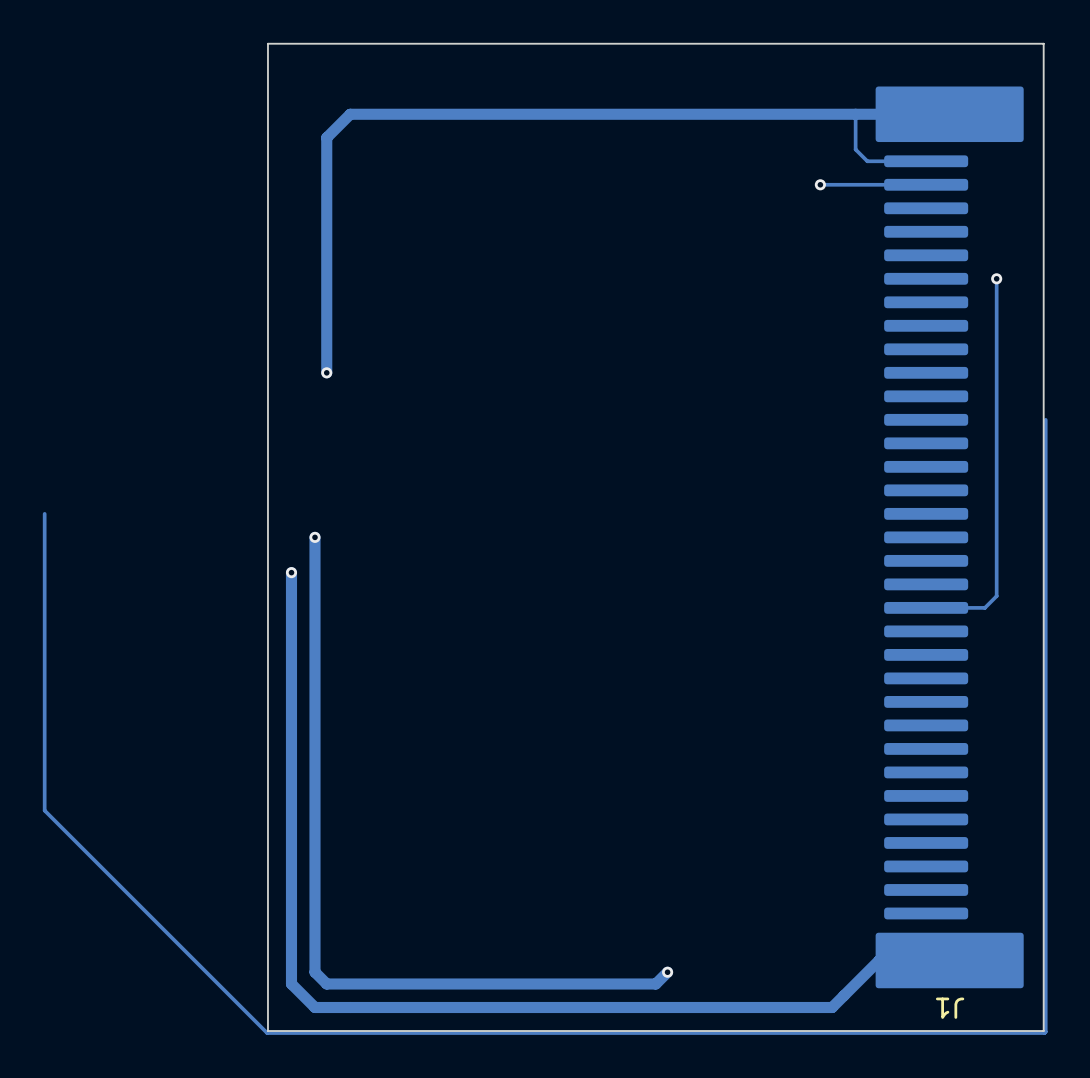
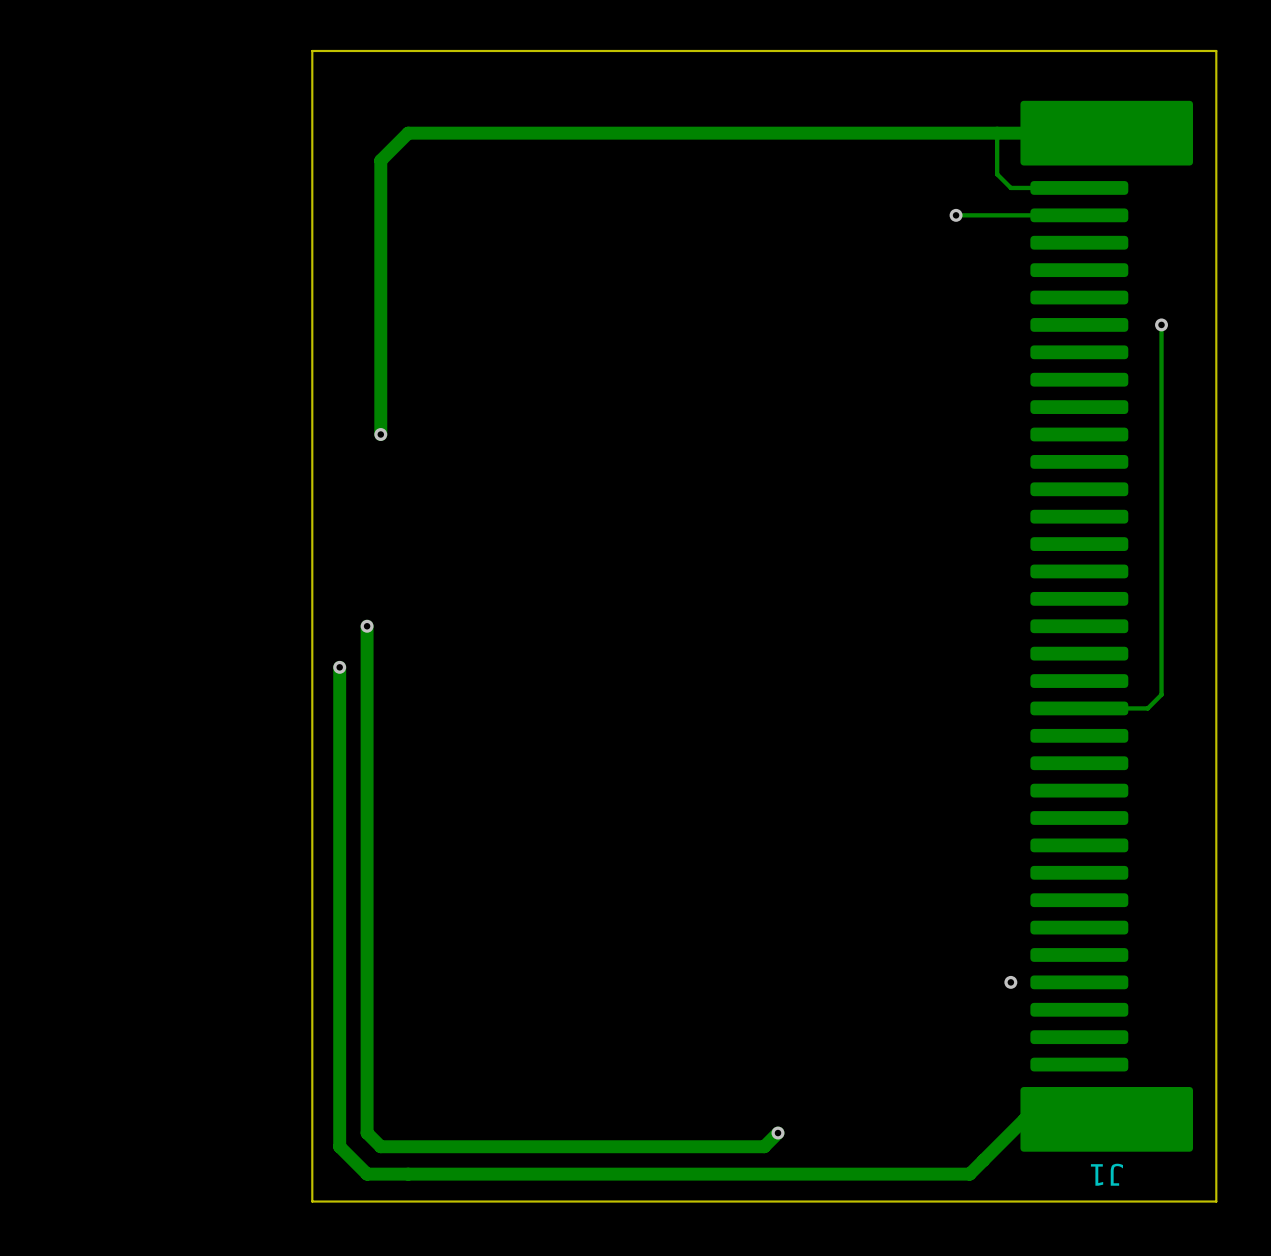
track: (1045, 419) (1044, 1033) (267, 1033) (44, 810) (44, 513) -> none
via: none -> (1010, 982)

